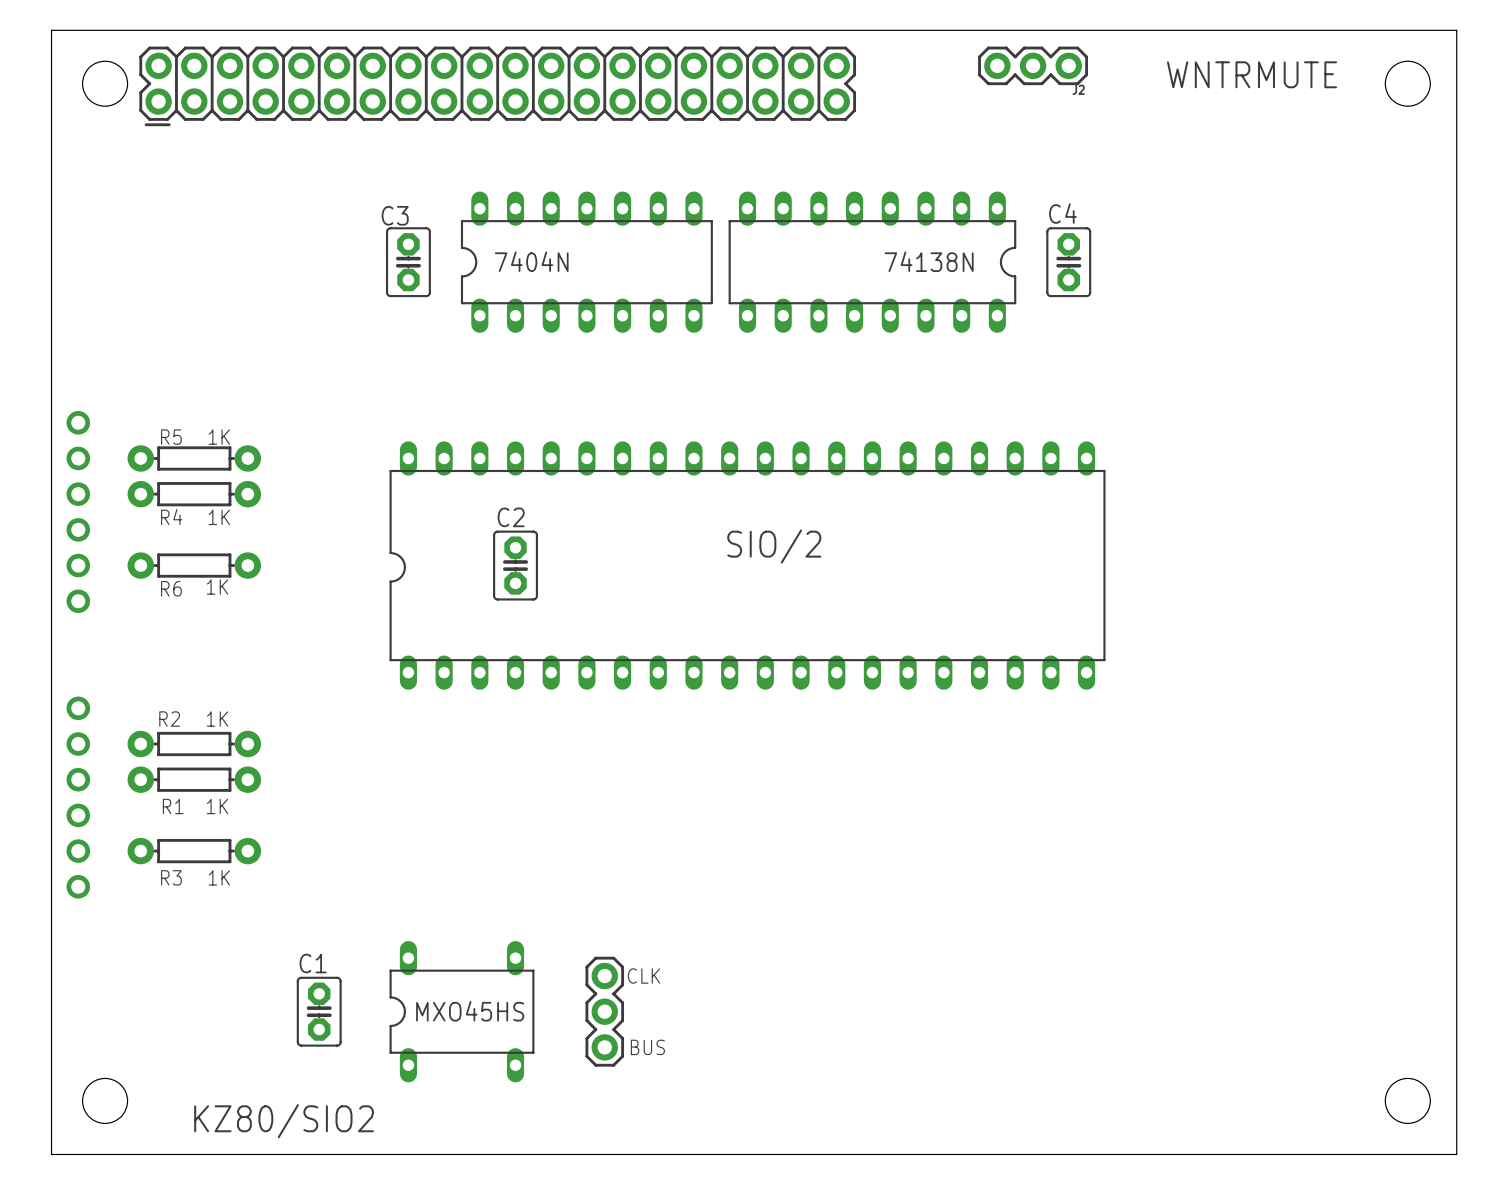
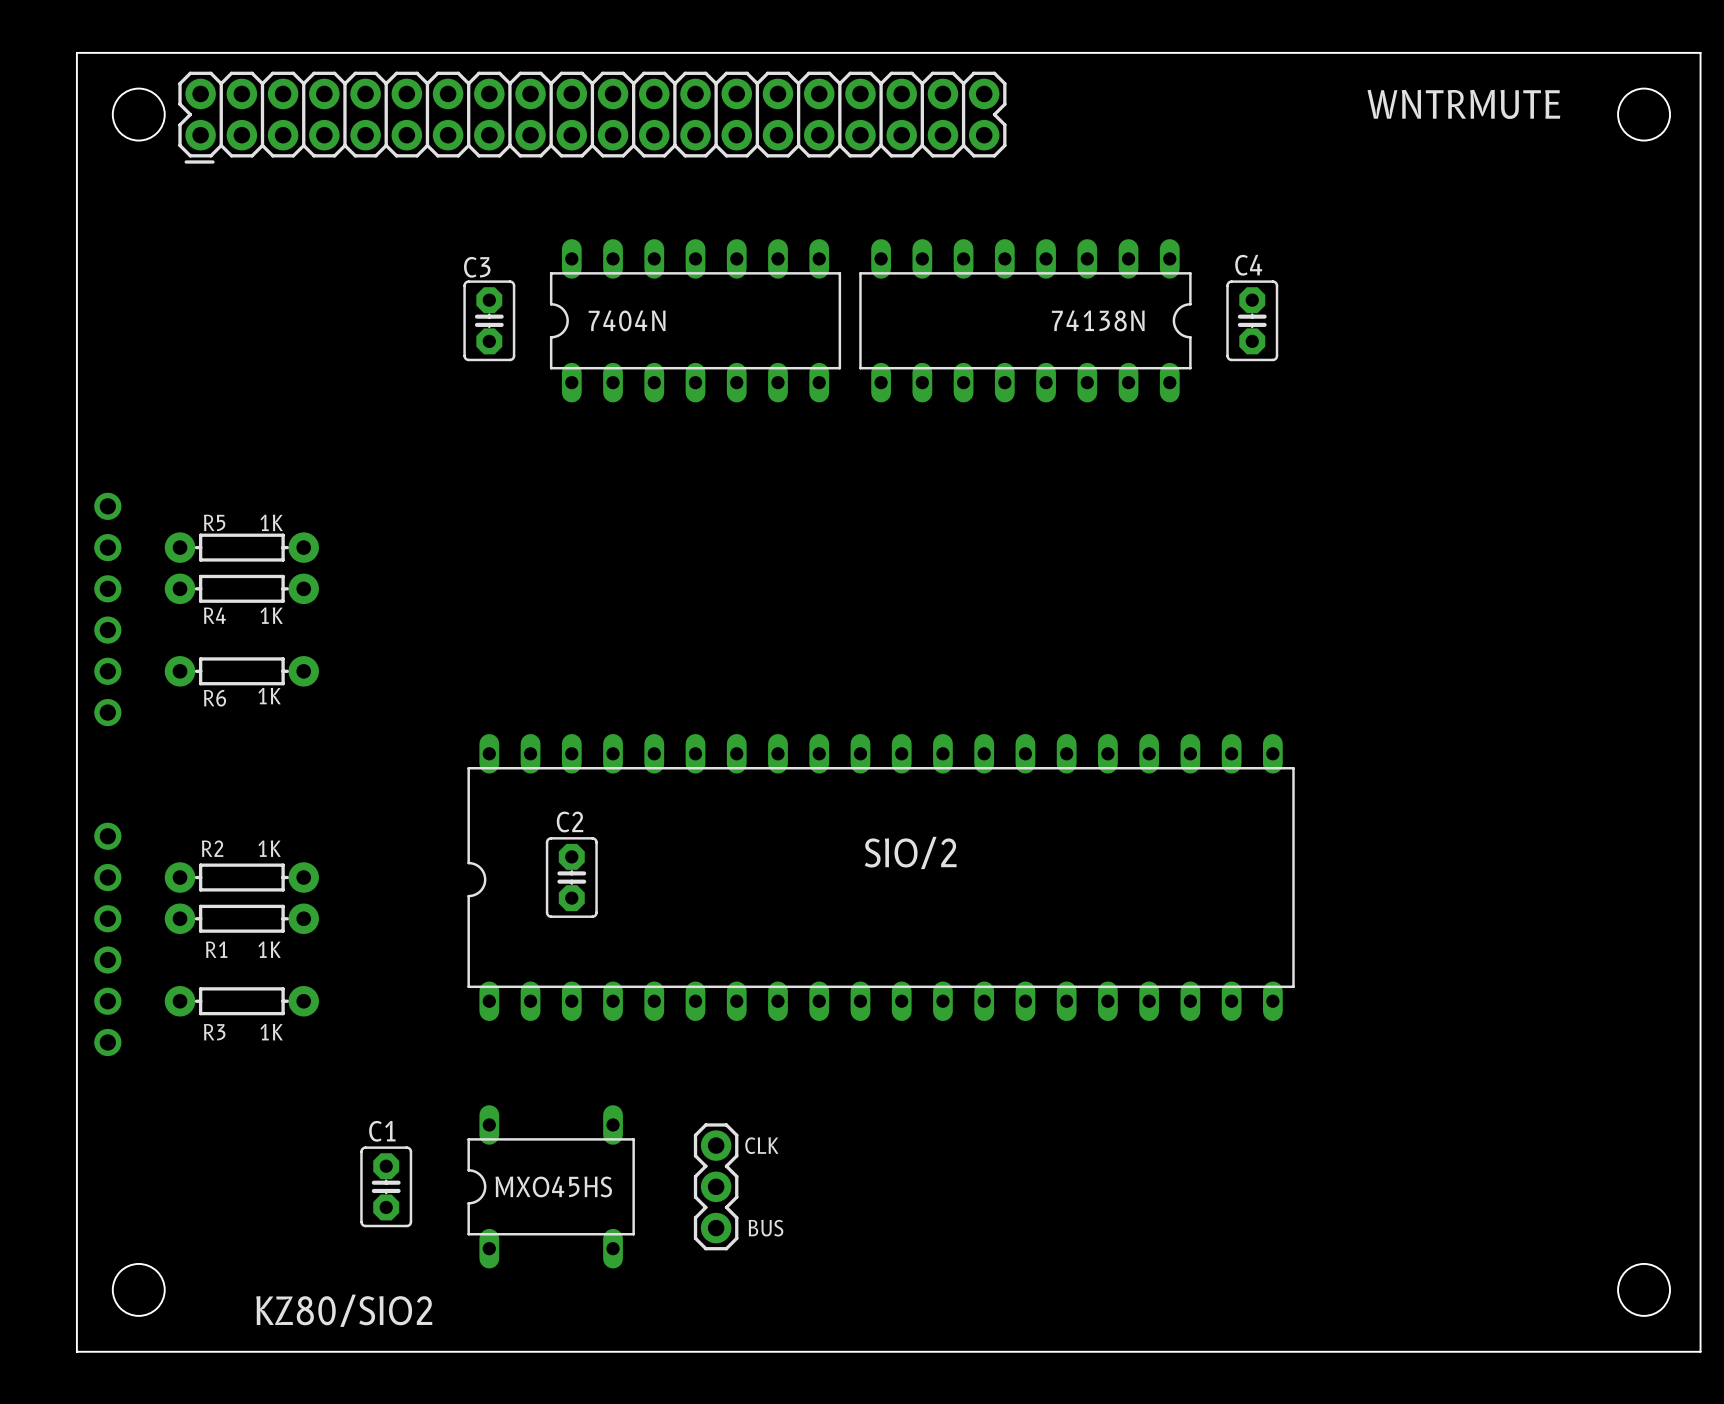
J2: (1033, 65) -> none
C2 position: (515, 565) -> (571, 877)
part position: (747, 565) -> (881, 877)

